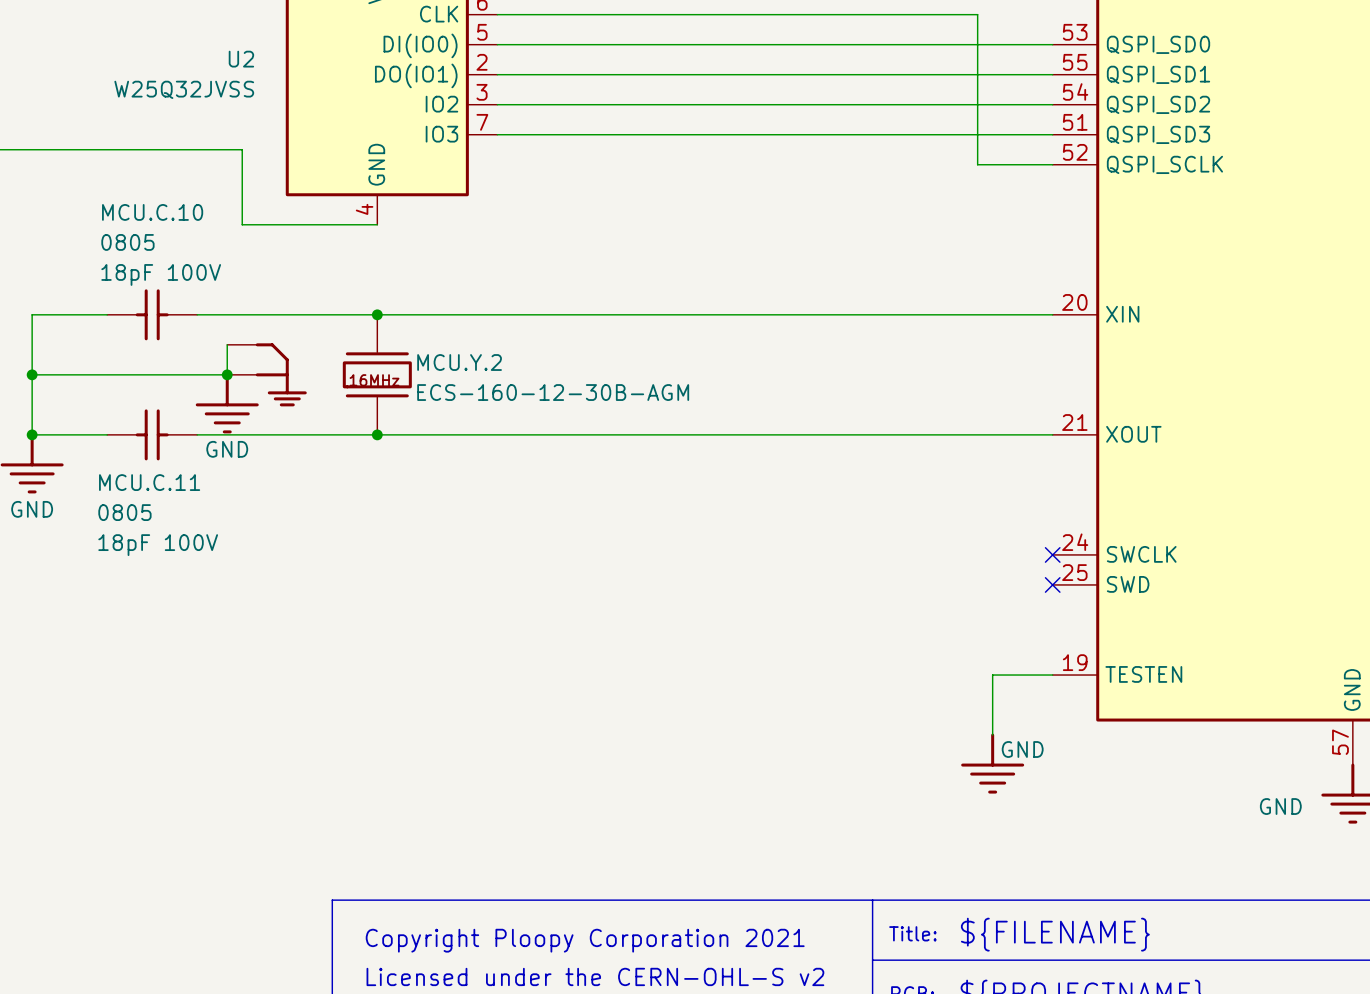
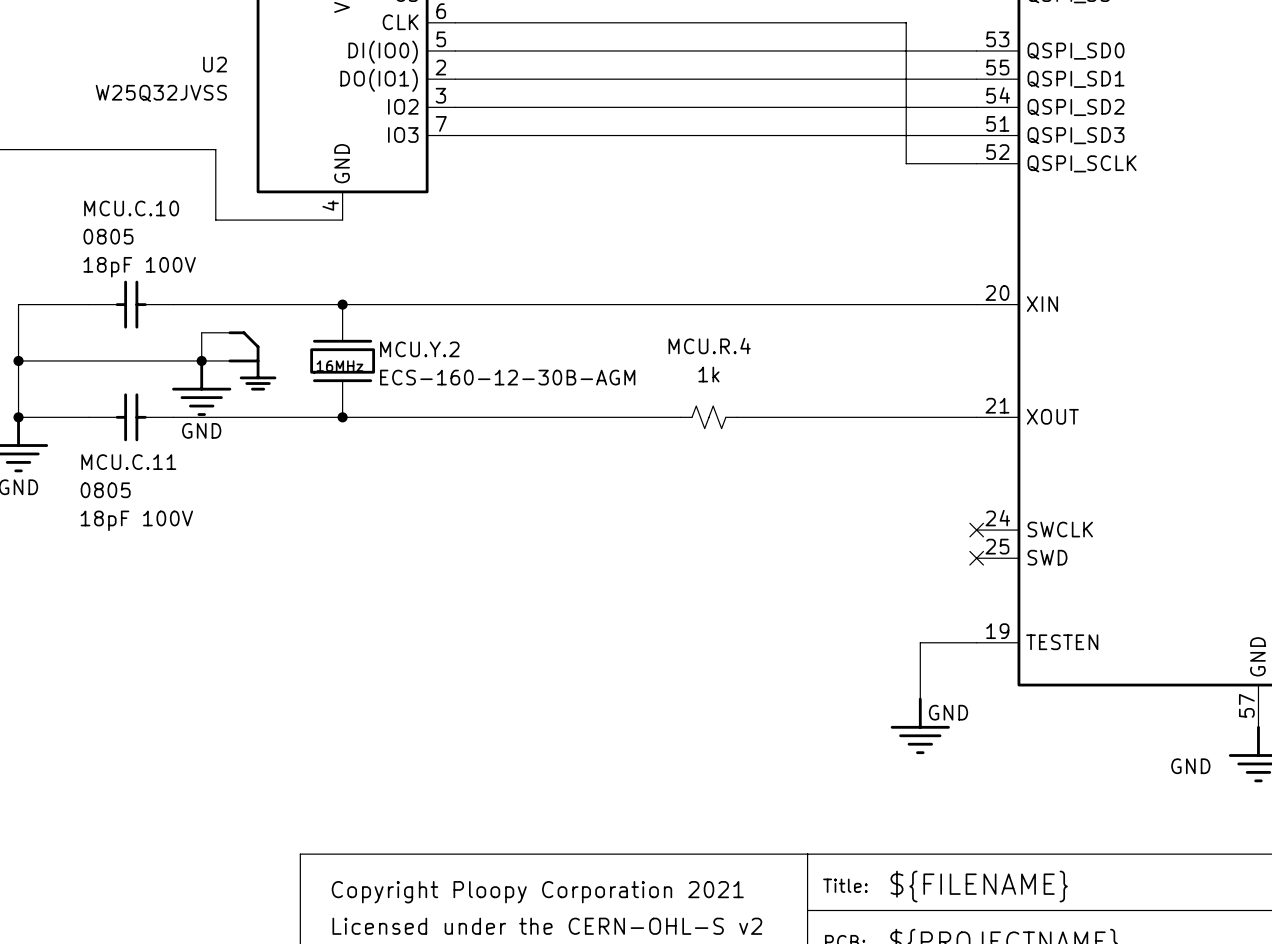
MCU.R.4: none -> 1k (708, 417)

